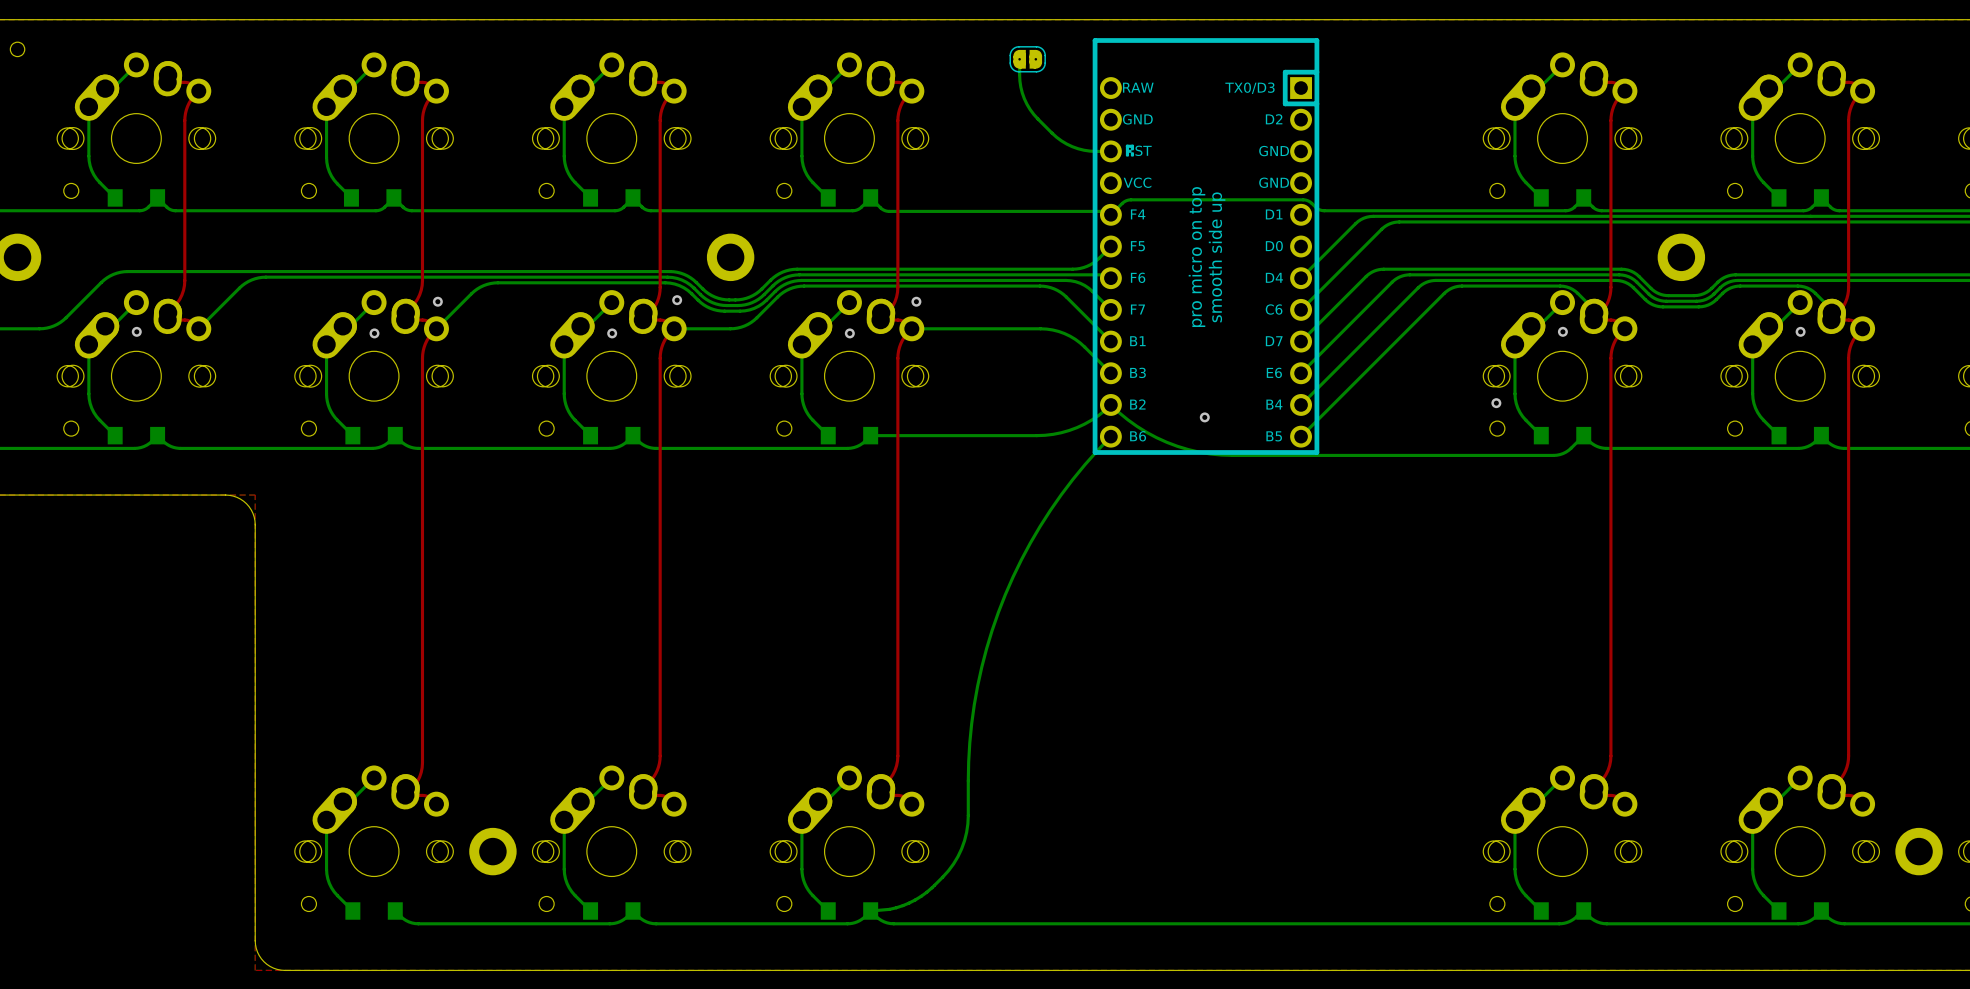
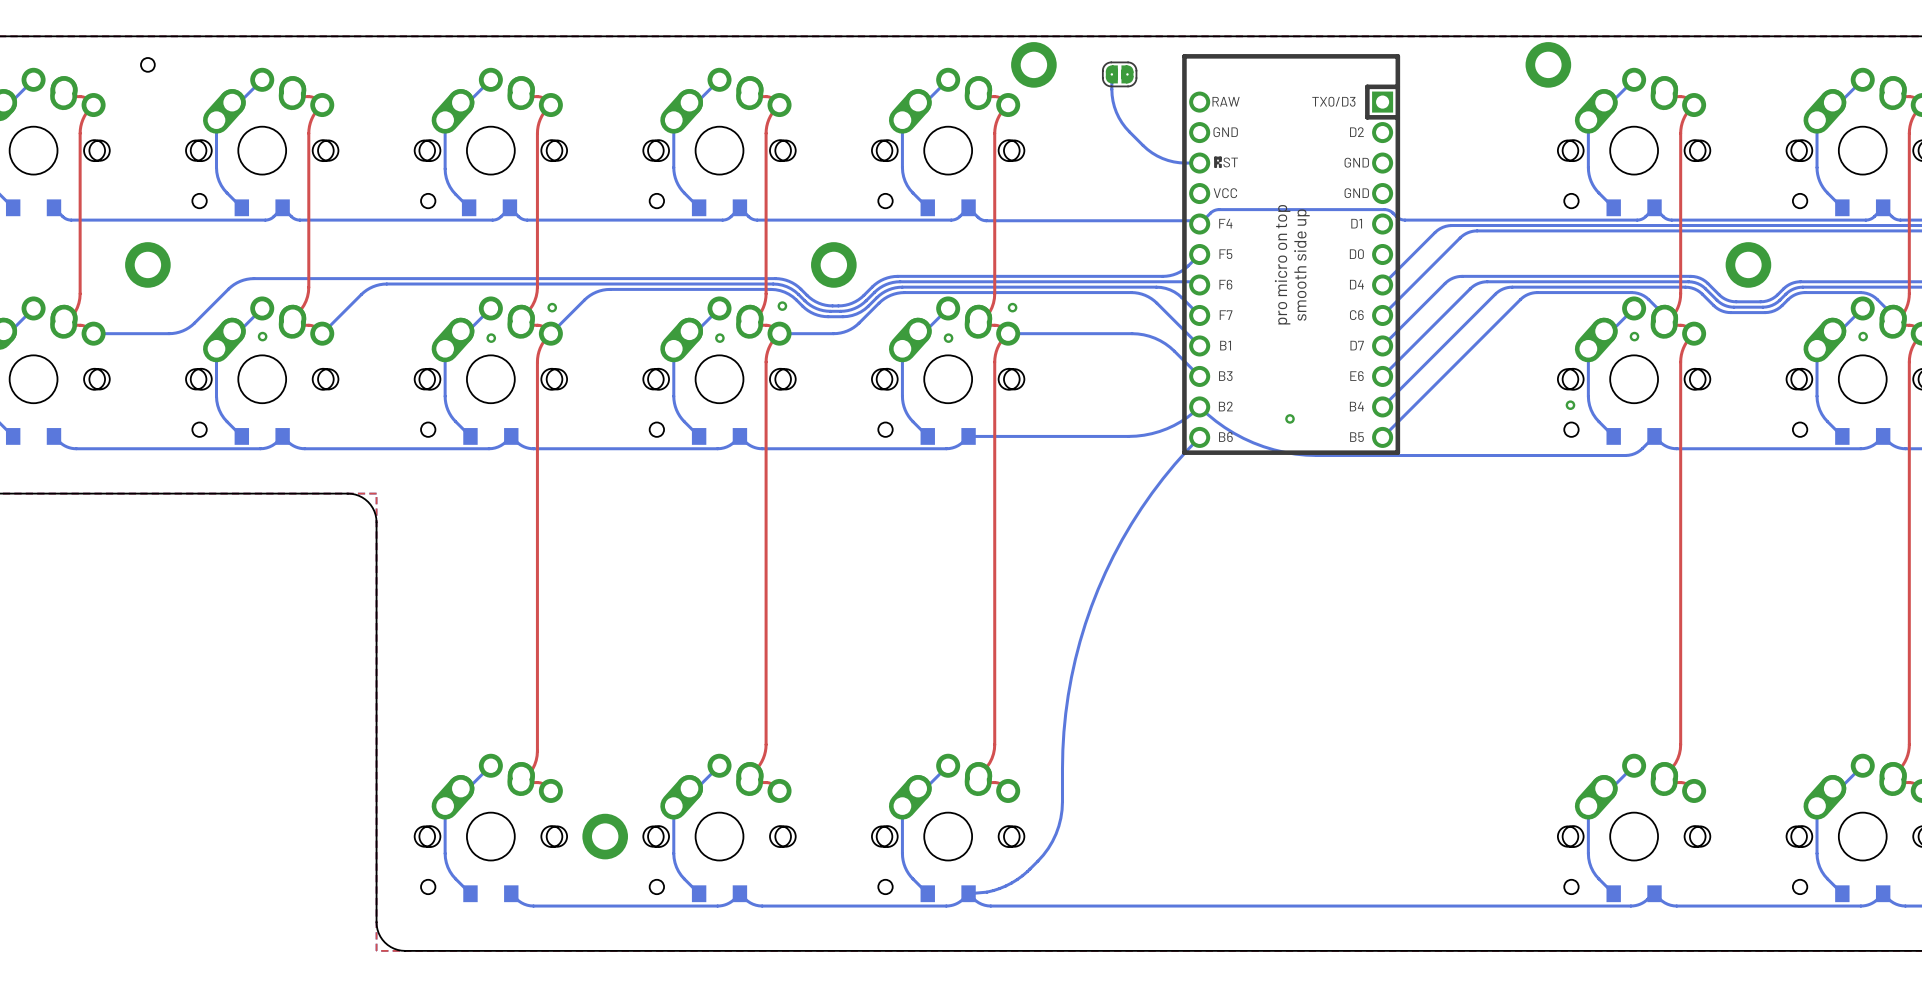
part: none -> (1033, 64)
part: none -> (1548, 64)

